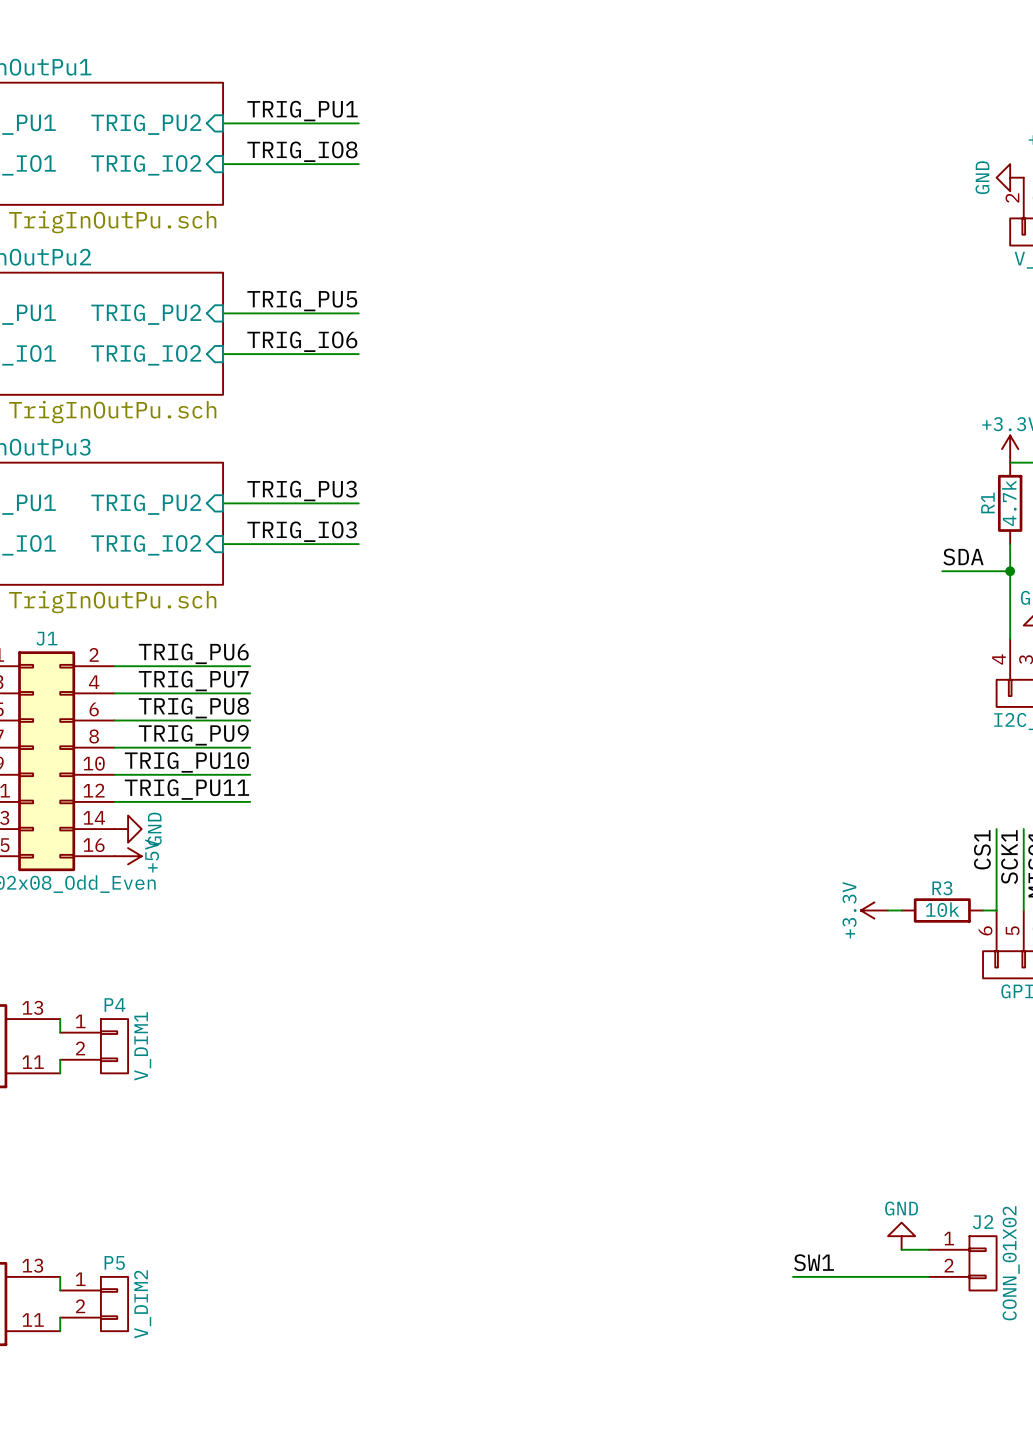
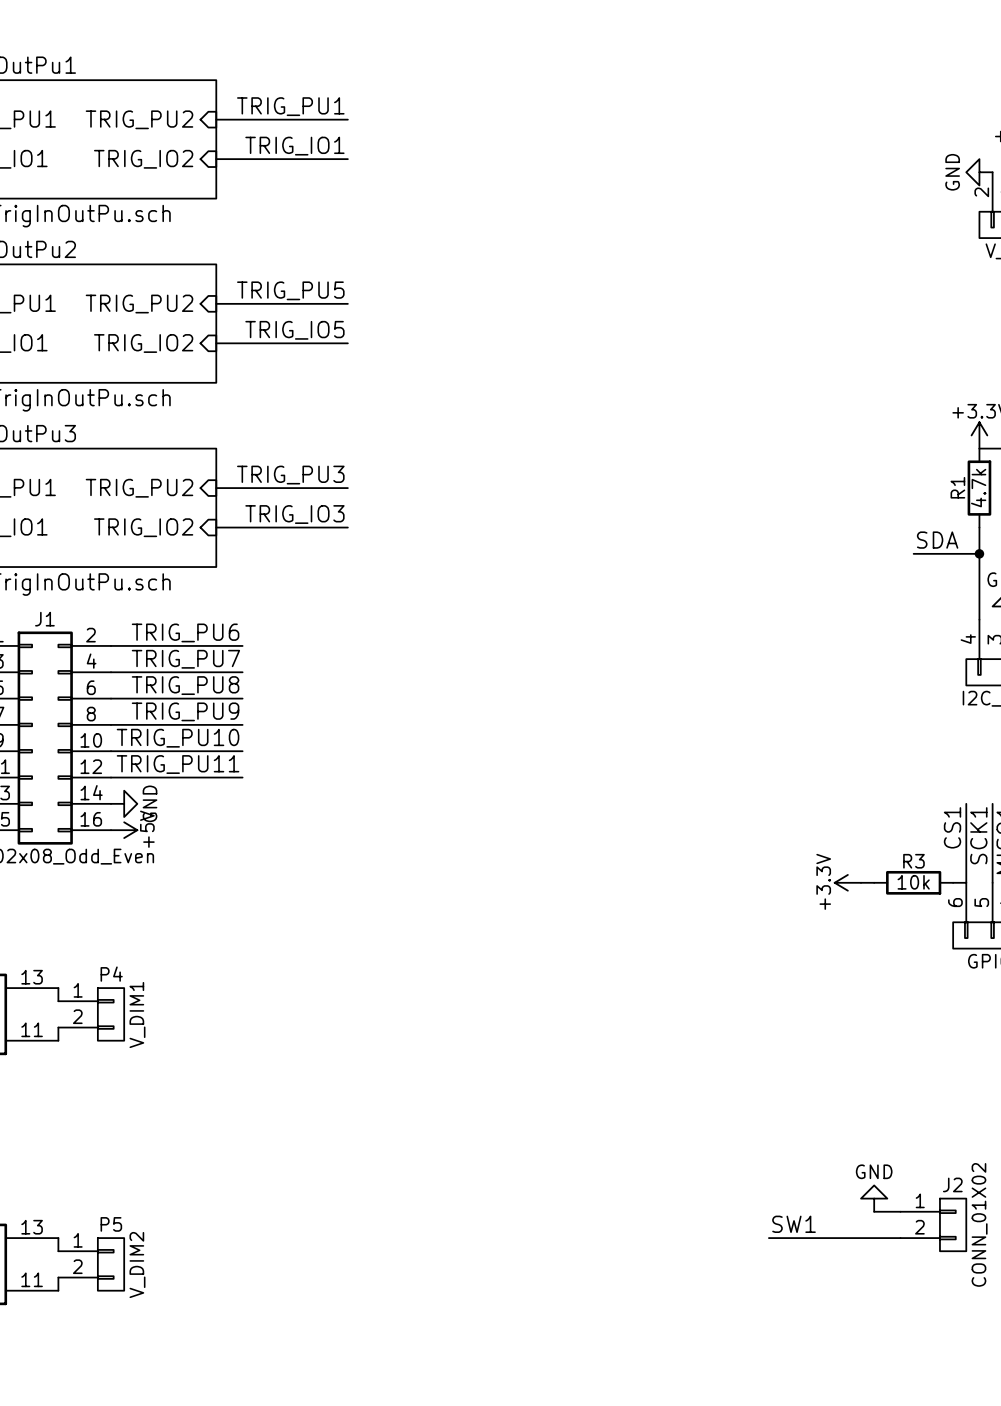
label: TRIG_IO8 (302, 151) -> TRIG_IO1 (294, 146)
label: TRIG_IO6 (302, 341) -> TRIG_IO5 (294, 330)

